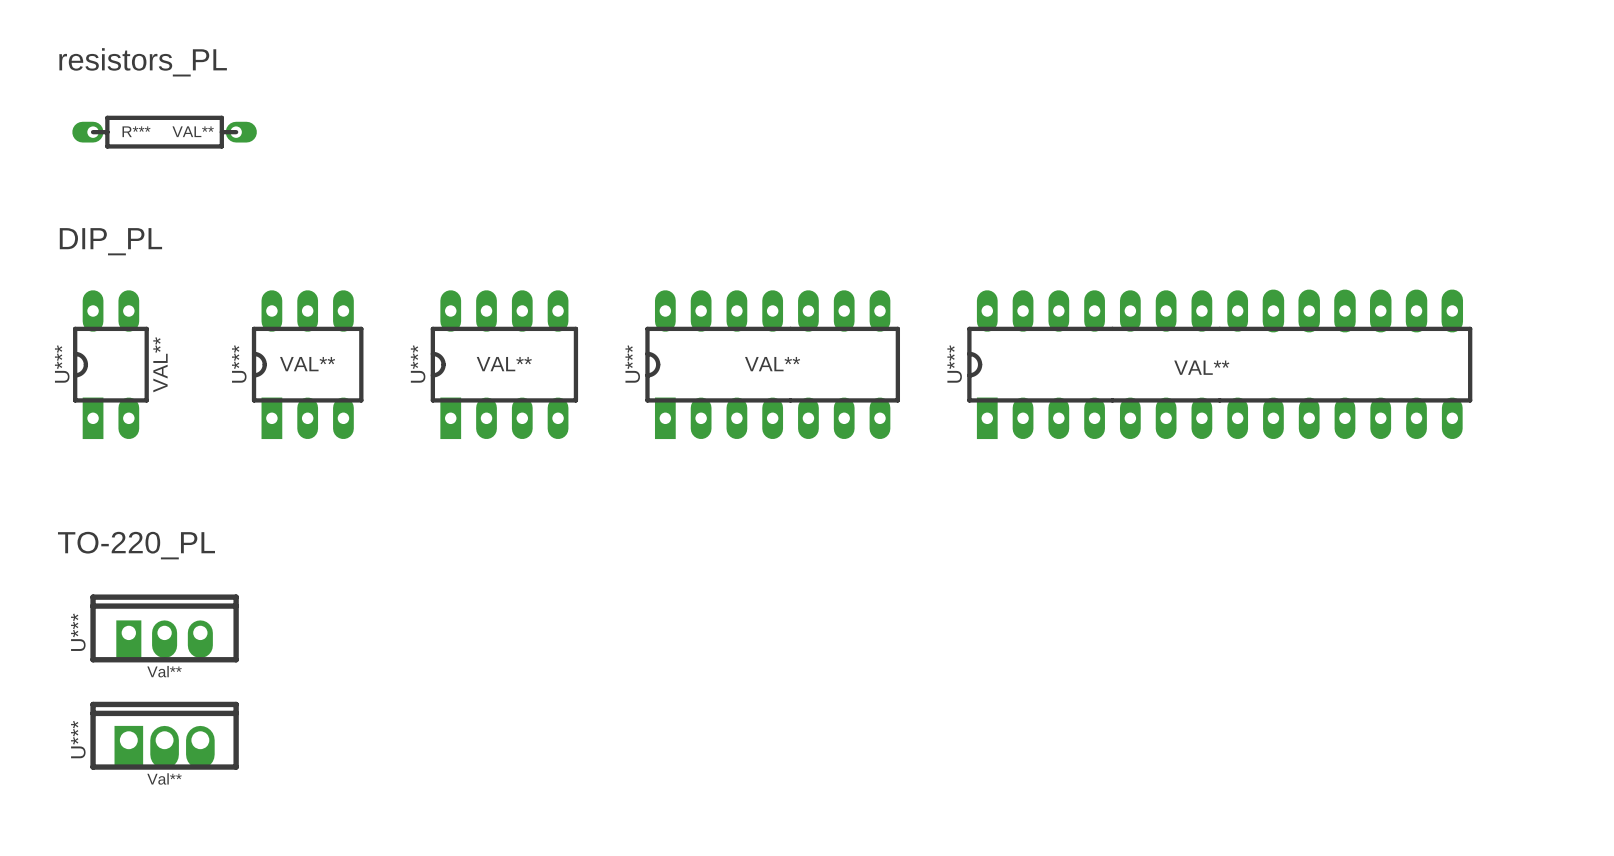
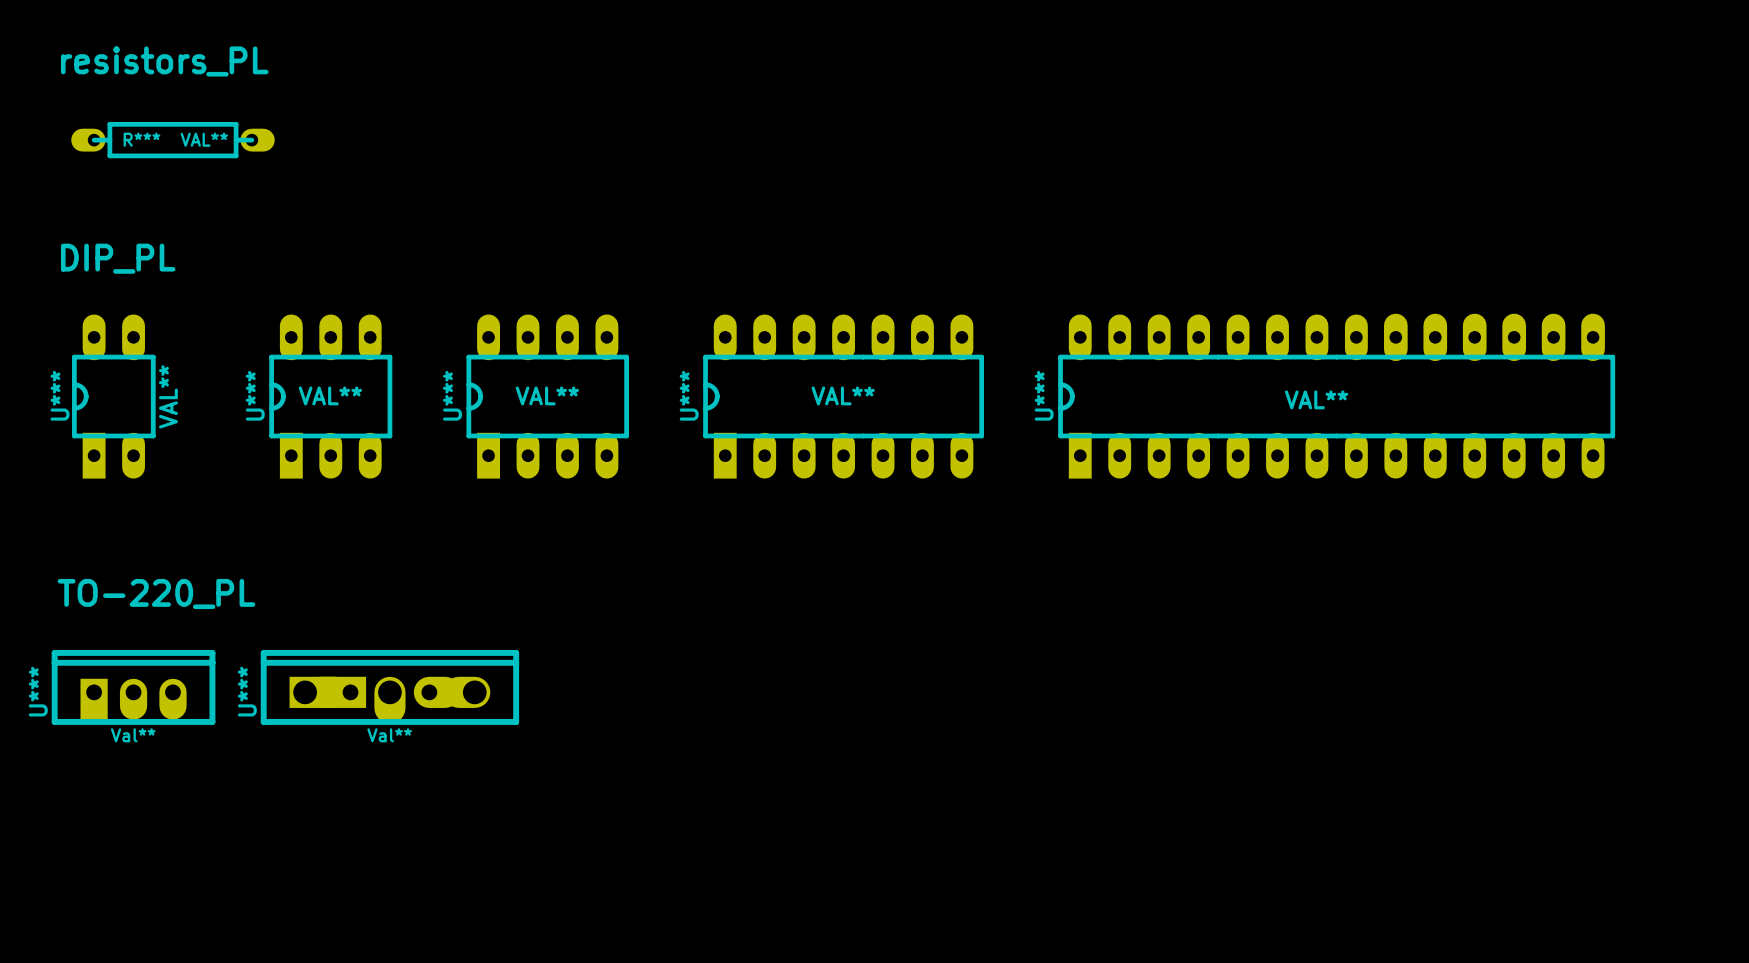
Val**: none -> U*** (133, 687)
Val**: U*** (164, 628) -> none
Val**: none -> U*** (389, 687)
Val**: U*** (164, 735) -> none

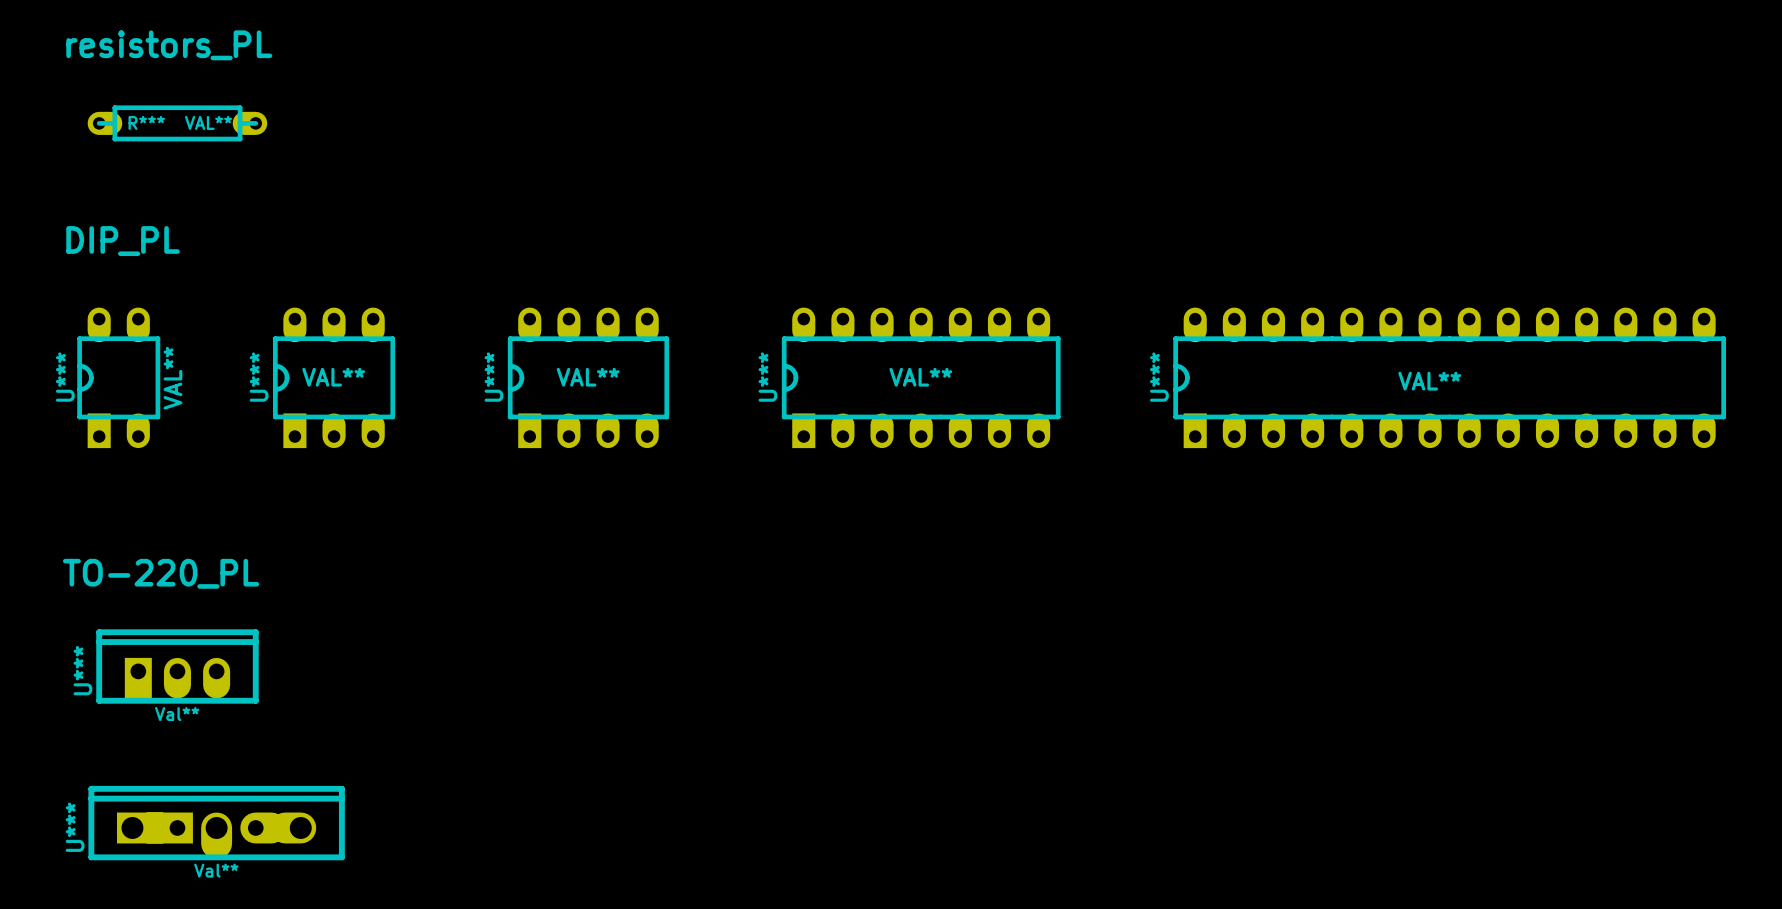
R*** footprint: [71, 121, 275, 159] -> [87, 105, 268, 142]
U*** footprint: [72, 314, 156, 479] -> [77, 307, 161, 449]
U*** footprint: [269, 314, 393, 479] -> [272, 307, 396, 449]
U***: VAL** (547, 396) -> none
U***: none -> VAL** (588, 377)
U***: VAL** (843, 396) -> none
U***: none -> VAL** (921, 377)
U***: VAL** (1336, 396) -> none
U***: none -> VAL** (1449, 377)
Val** position: (133, 687) -> (177, 666)
Val**: U*** (389, 687) -> none
Val**: none -> U*** (216, 823)

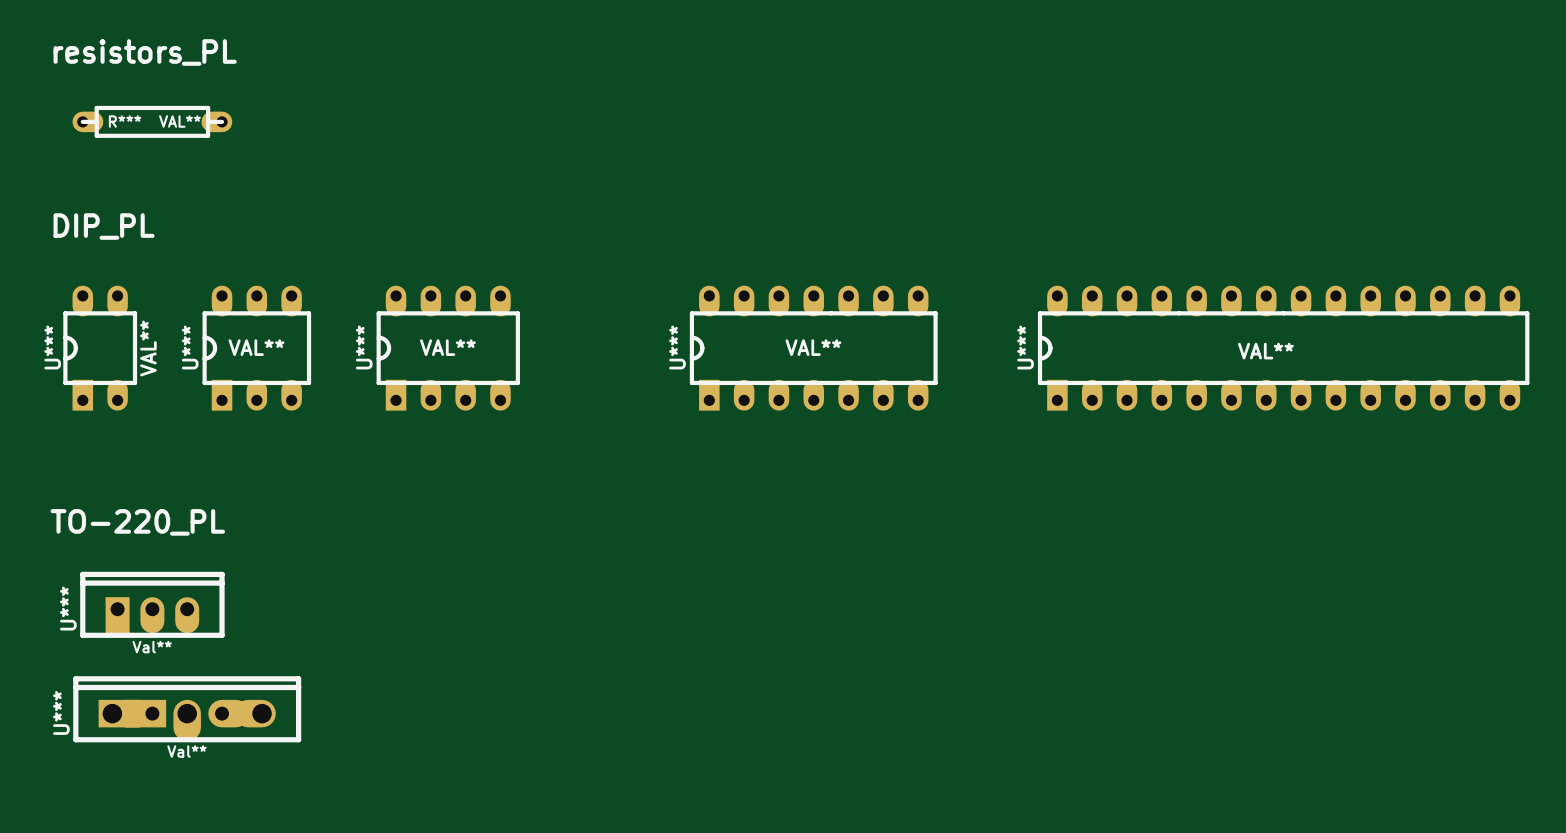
U*** position: (334, 377) -> (256, 348)
U*** position: (588, 377) -> (448, 348)
Val** position: (216, 823) -> (187, 709)

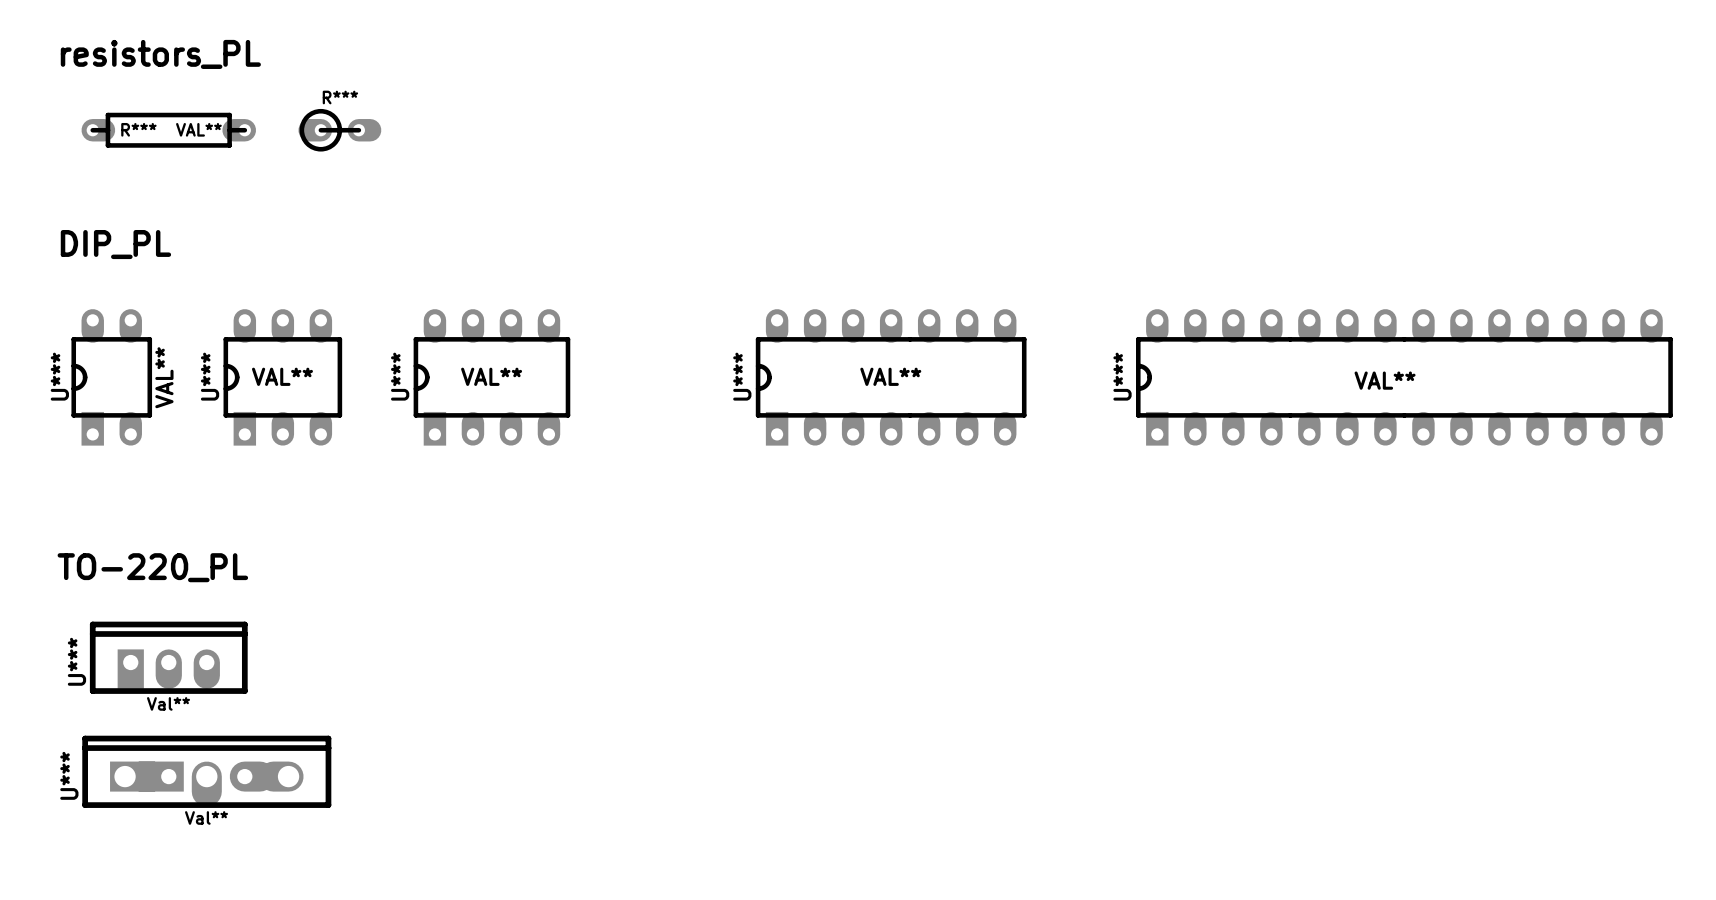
R***: none -> (339, 130)

